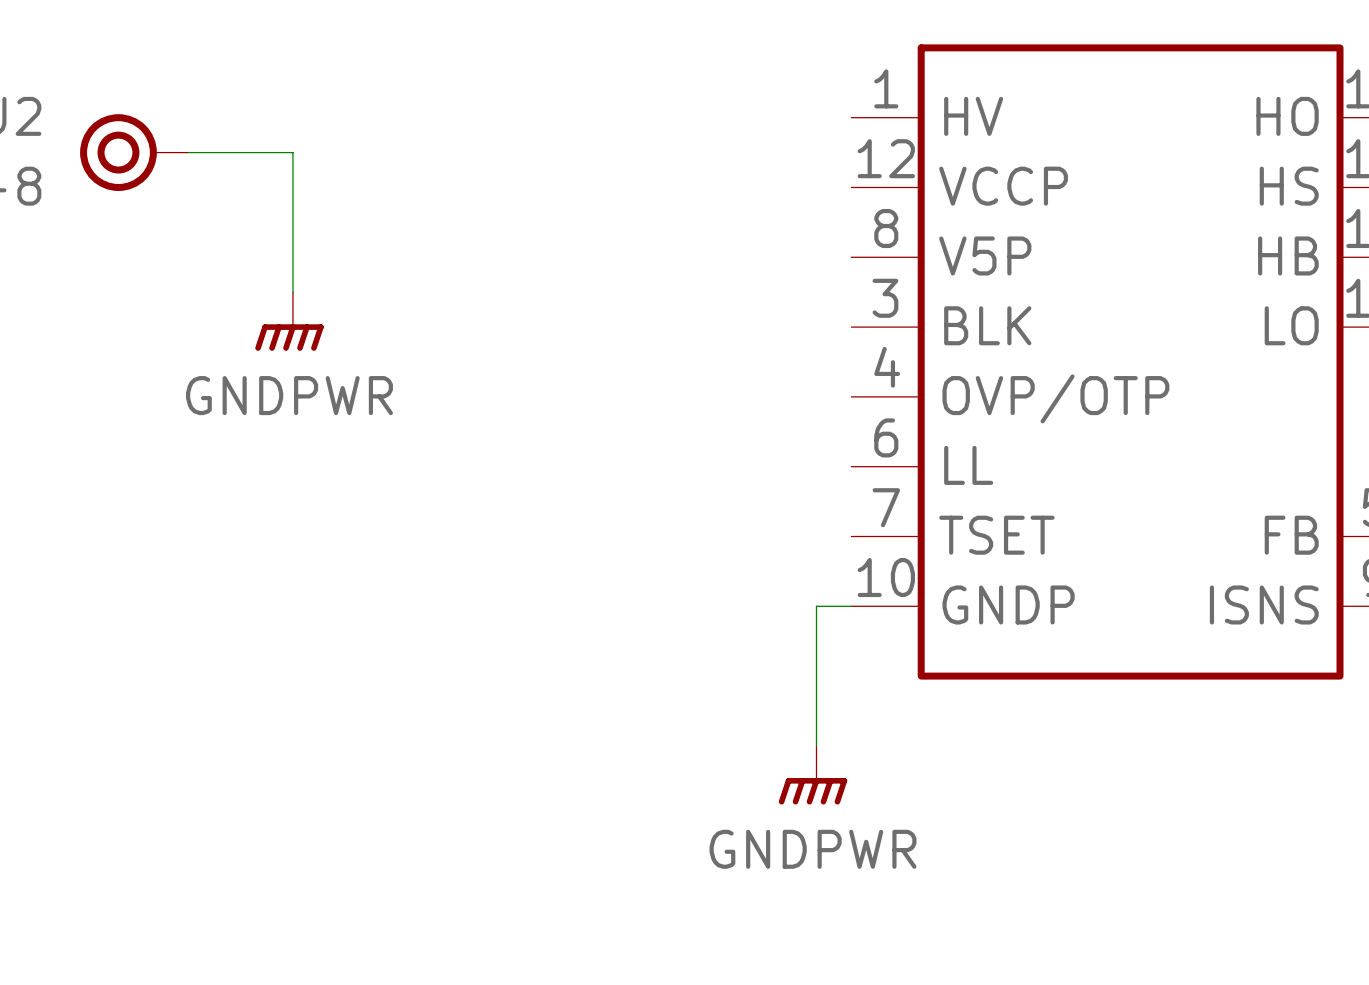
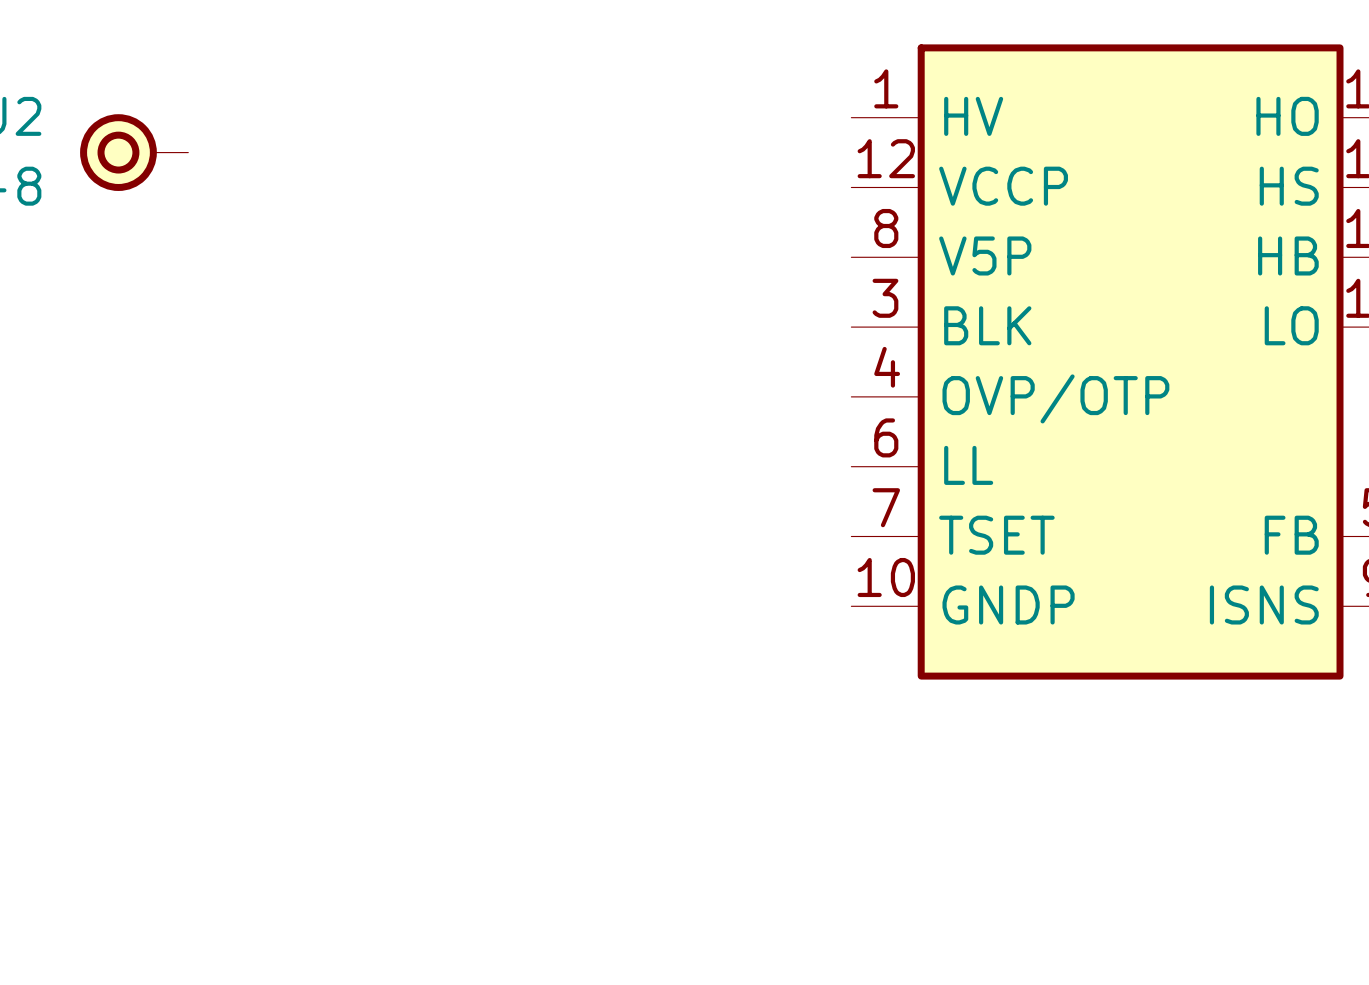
wire: (188, 152) (292, 152) (292, 292) -> none
power symbol: GNDPWR (289, 321) -> none
wire: (851, 606) (816, 606) (816, 745) -> none
power symbol: GNDPWR (813, 775) -> none

